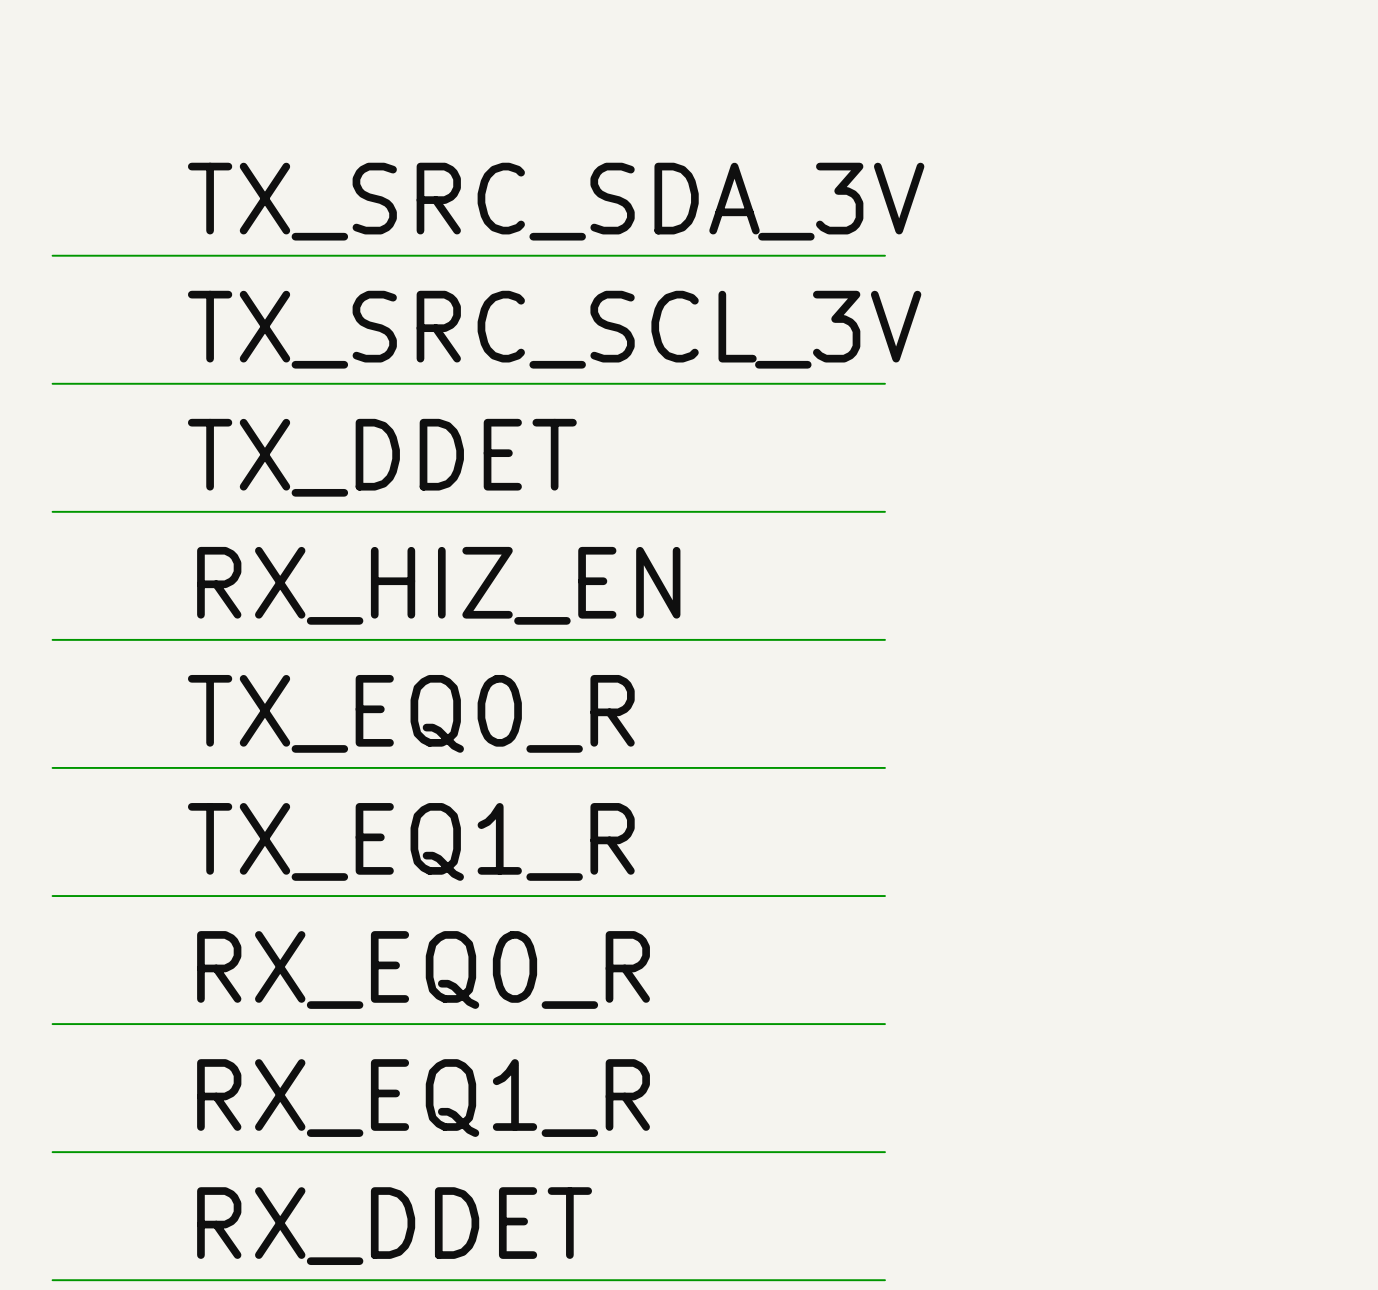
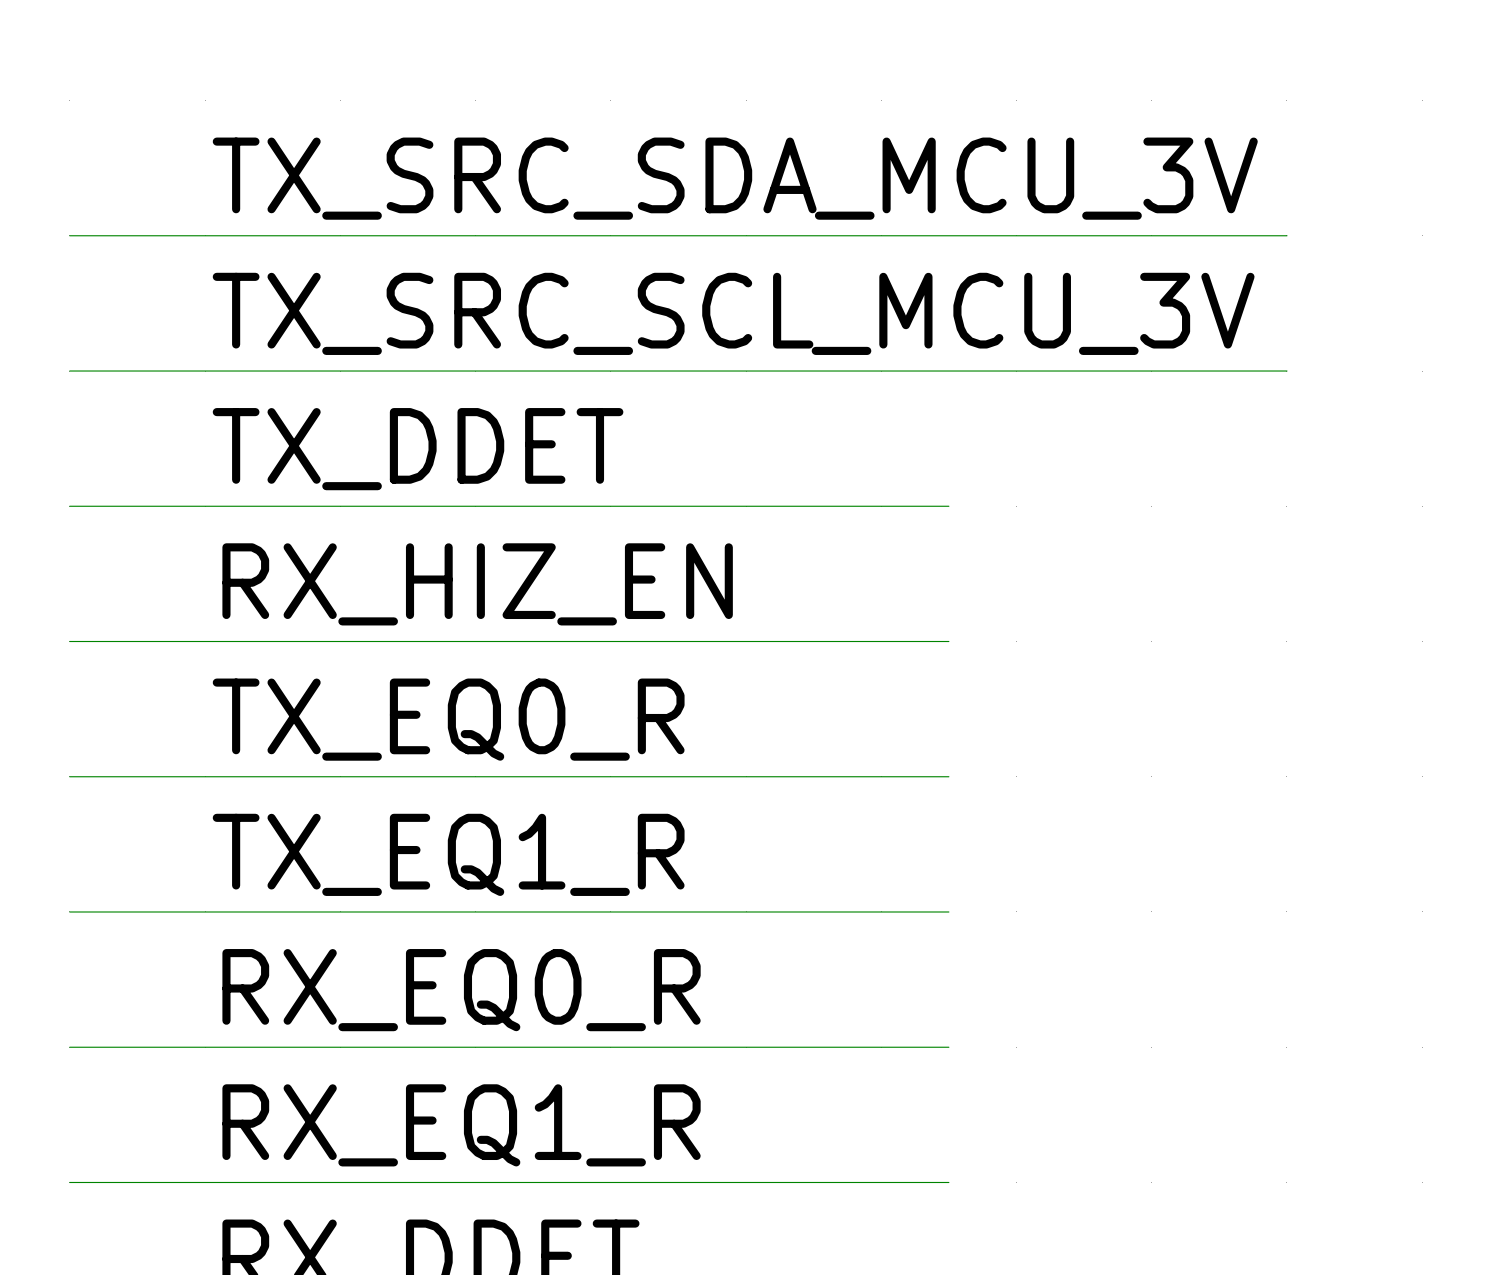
label: TX_SRC_SDA_3V (556, 201) -> TX_SRC_SDA_MCU_3V (735, 178)
wire: none -> (948, 235) (1286, 235)
label: TX_SRC_SCL_3V (554, 329) -> TX_SRC_SCL_MCU_3V (733, 313)
wire: none -> (948, 371) (1286, 371)

